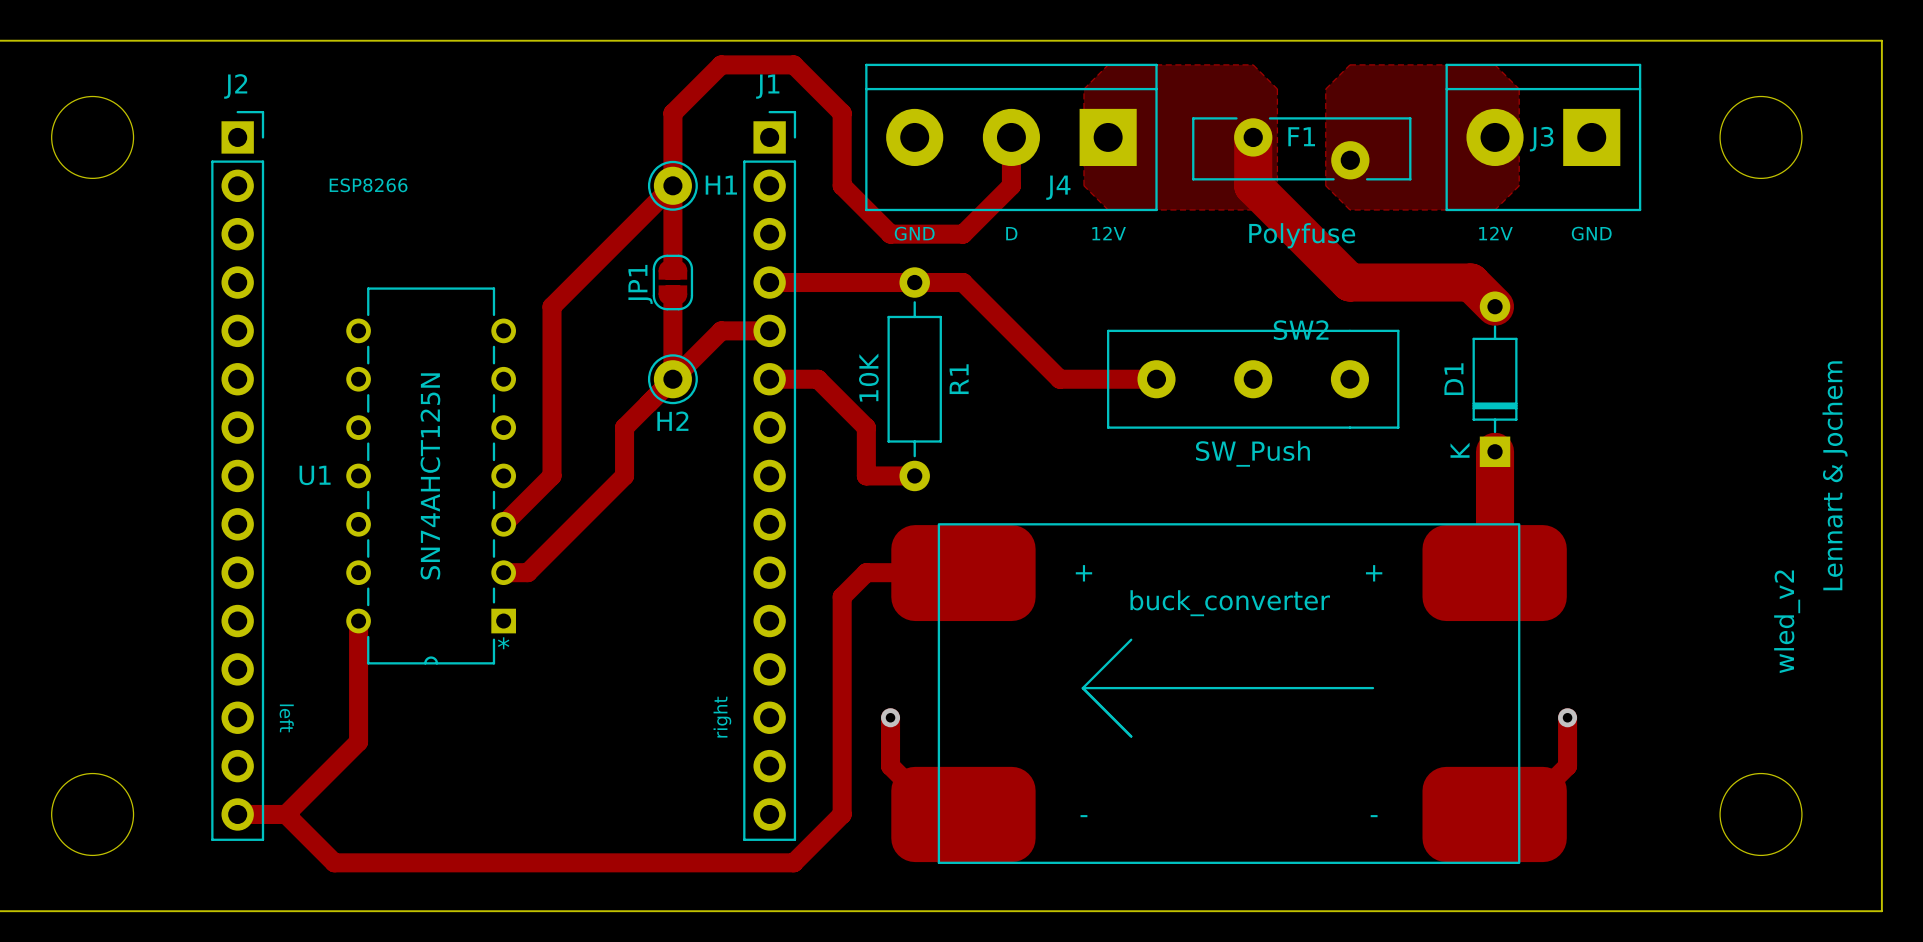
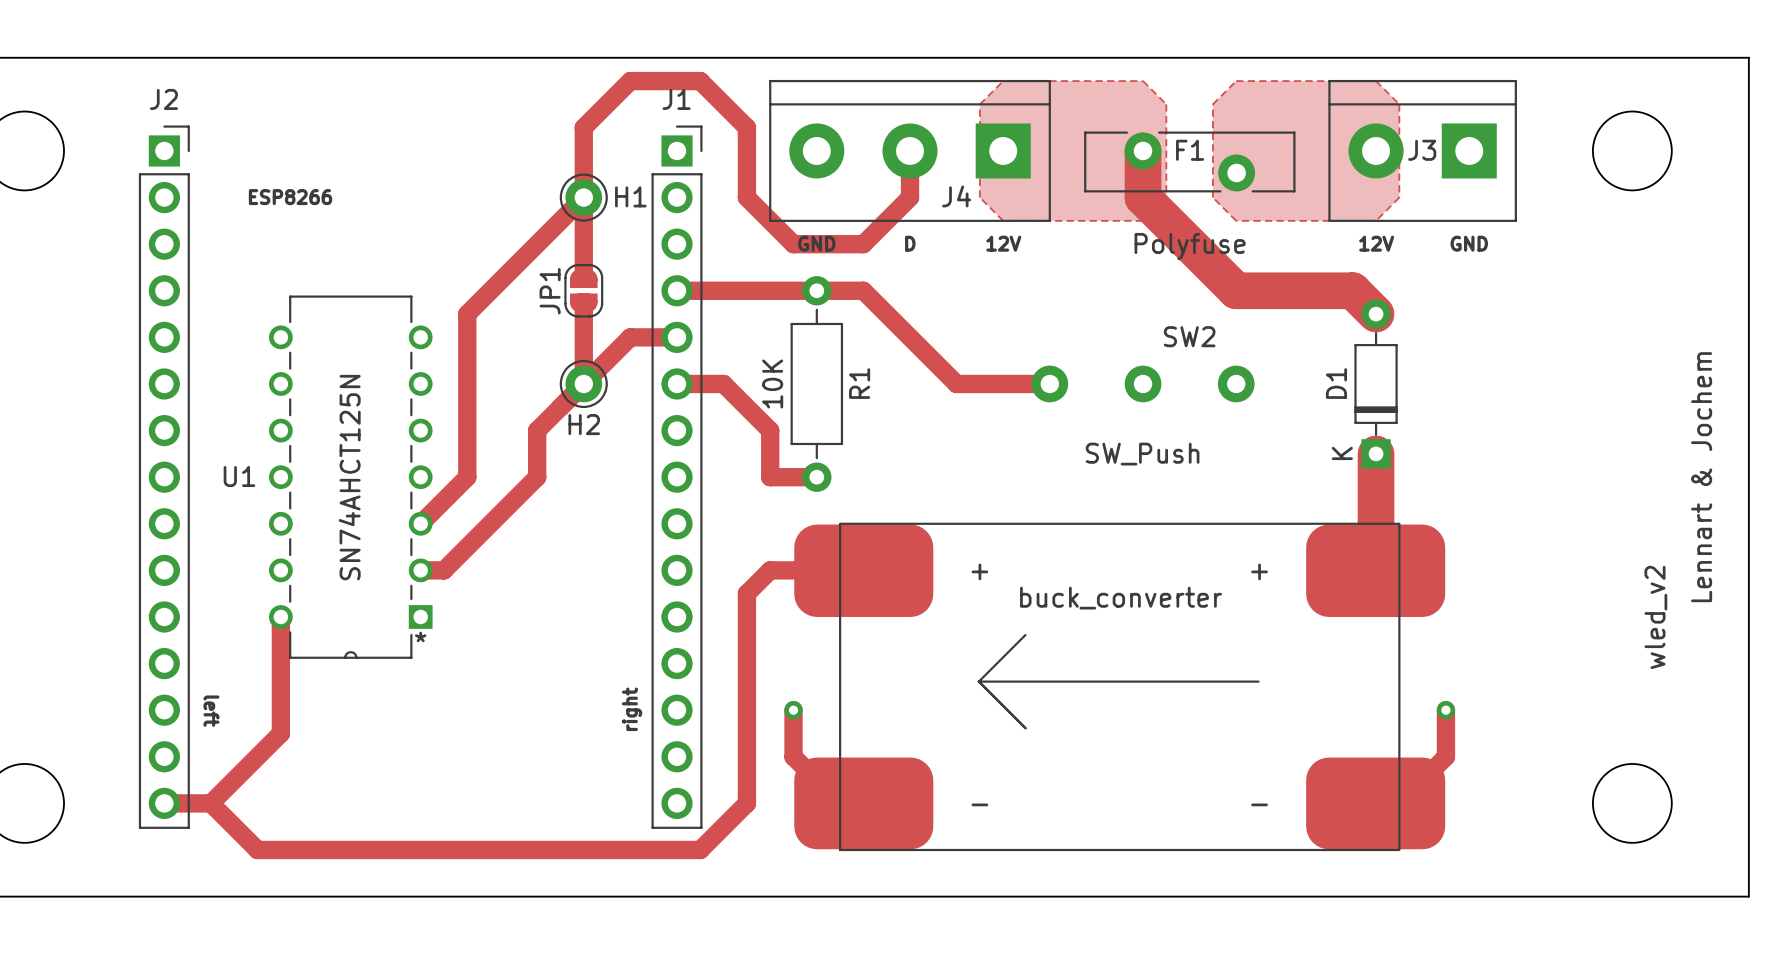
SW2 footprint: [1107, 329, 1400, 429] -> [1031, 365, 1255, 403]

